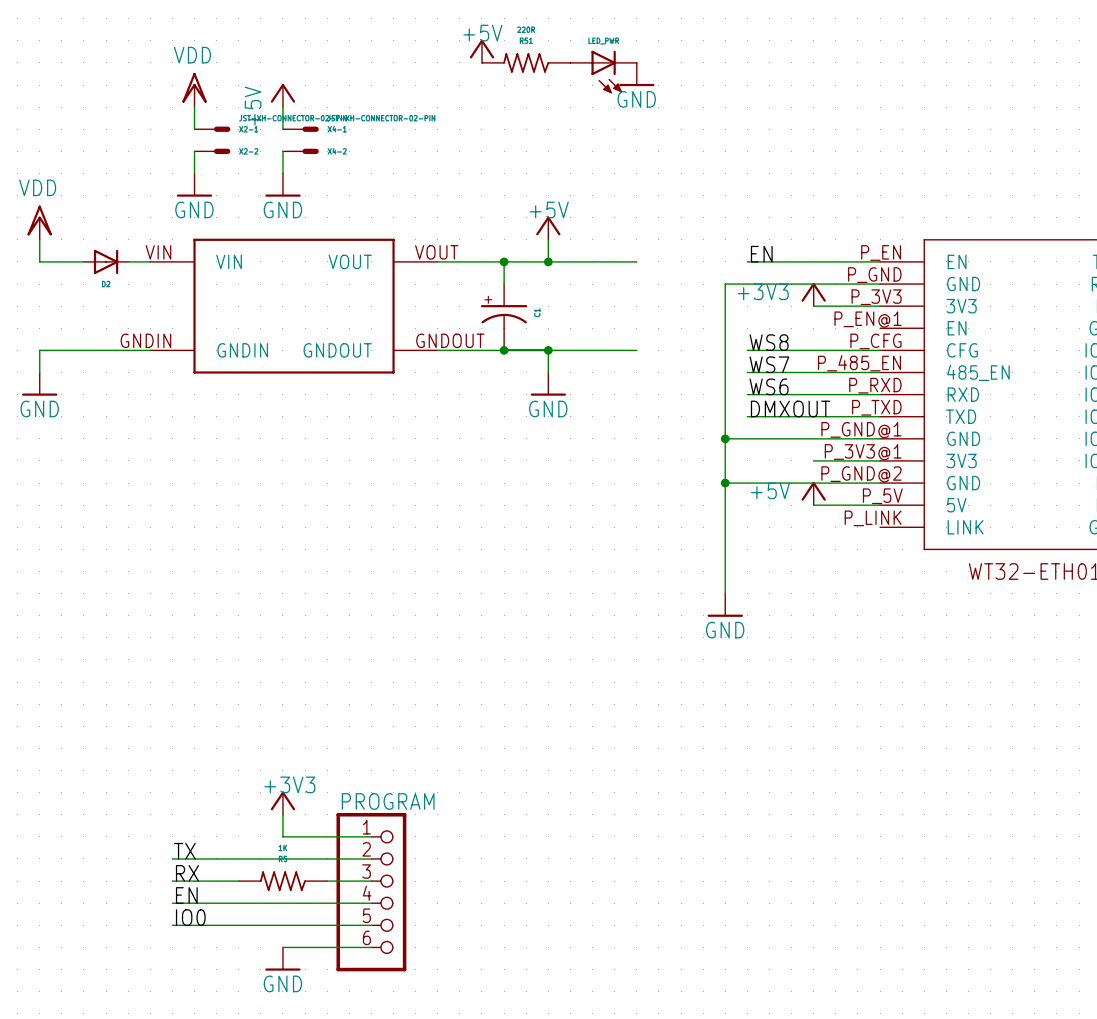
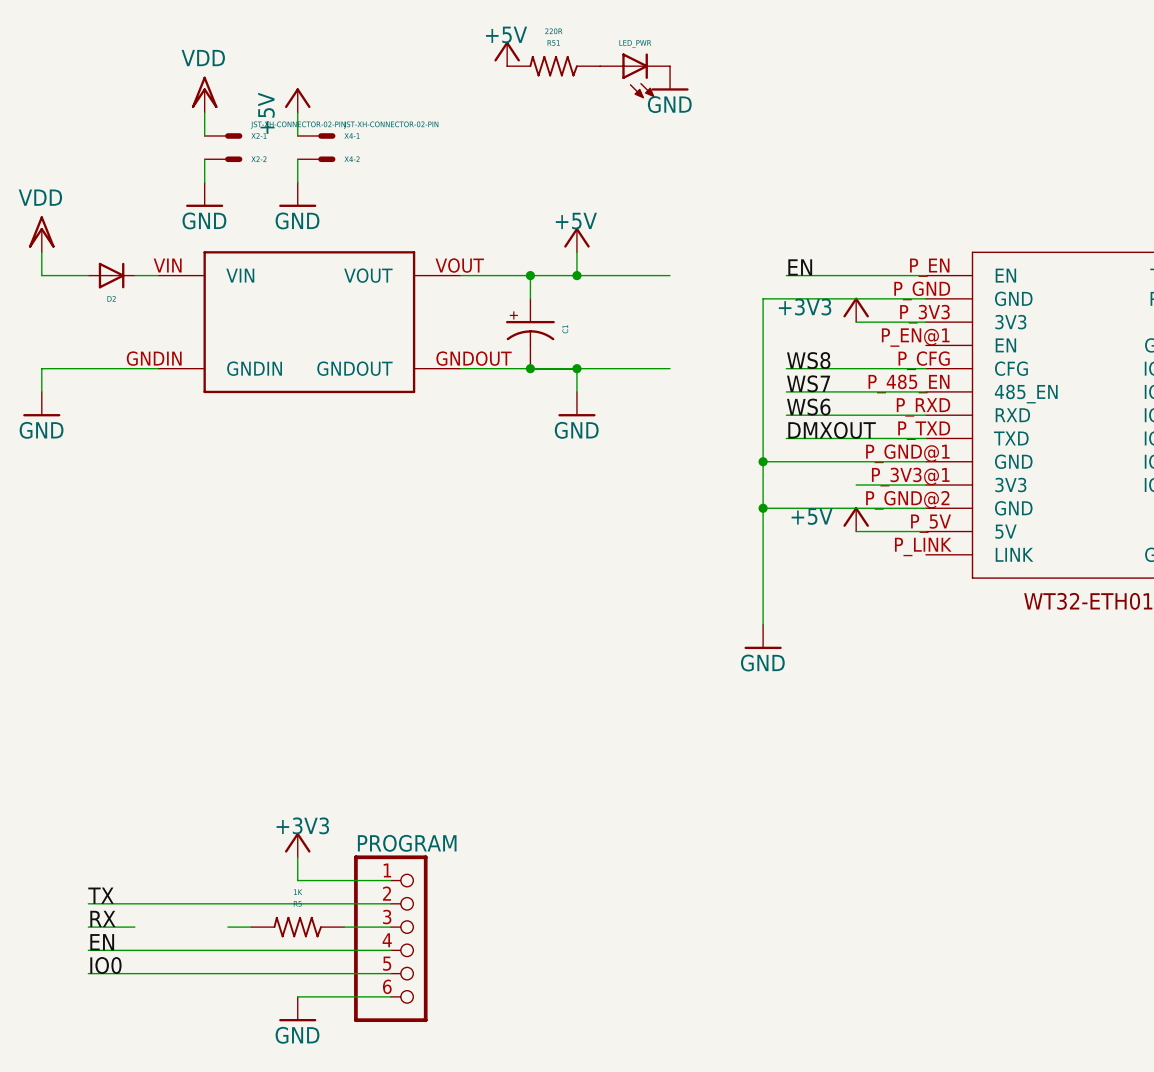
label position: TX (184, 851) -> TX (101, 895)
wire: none -> (88, 903) (181, 903)
label position: RX (187, 873) -> RX (102, 918)
wire: (172, 881) (216, 881) -> (88, 927) (134, 927)
label position: EN (186, 895) -> EN (102, 942)
wire: none -> (88, 950) (181, 950)
label position: IO0 (190, 917) -> IO0 (105, 965)
wire: none -> (88, 973) (181, 973)

